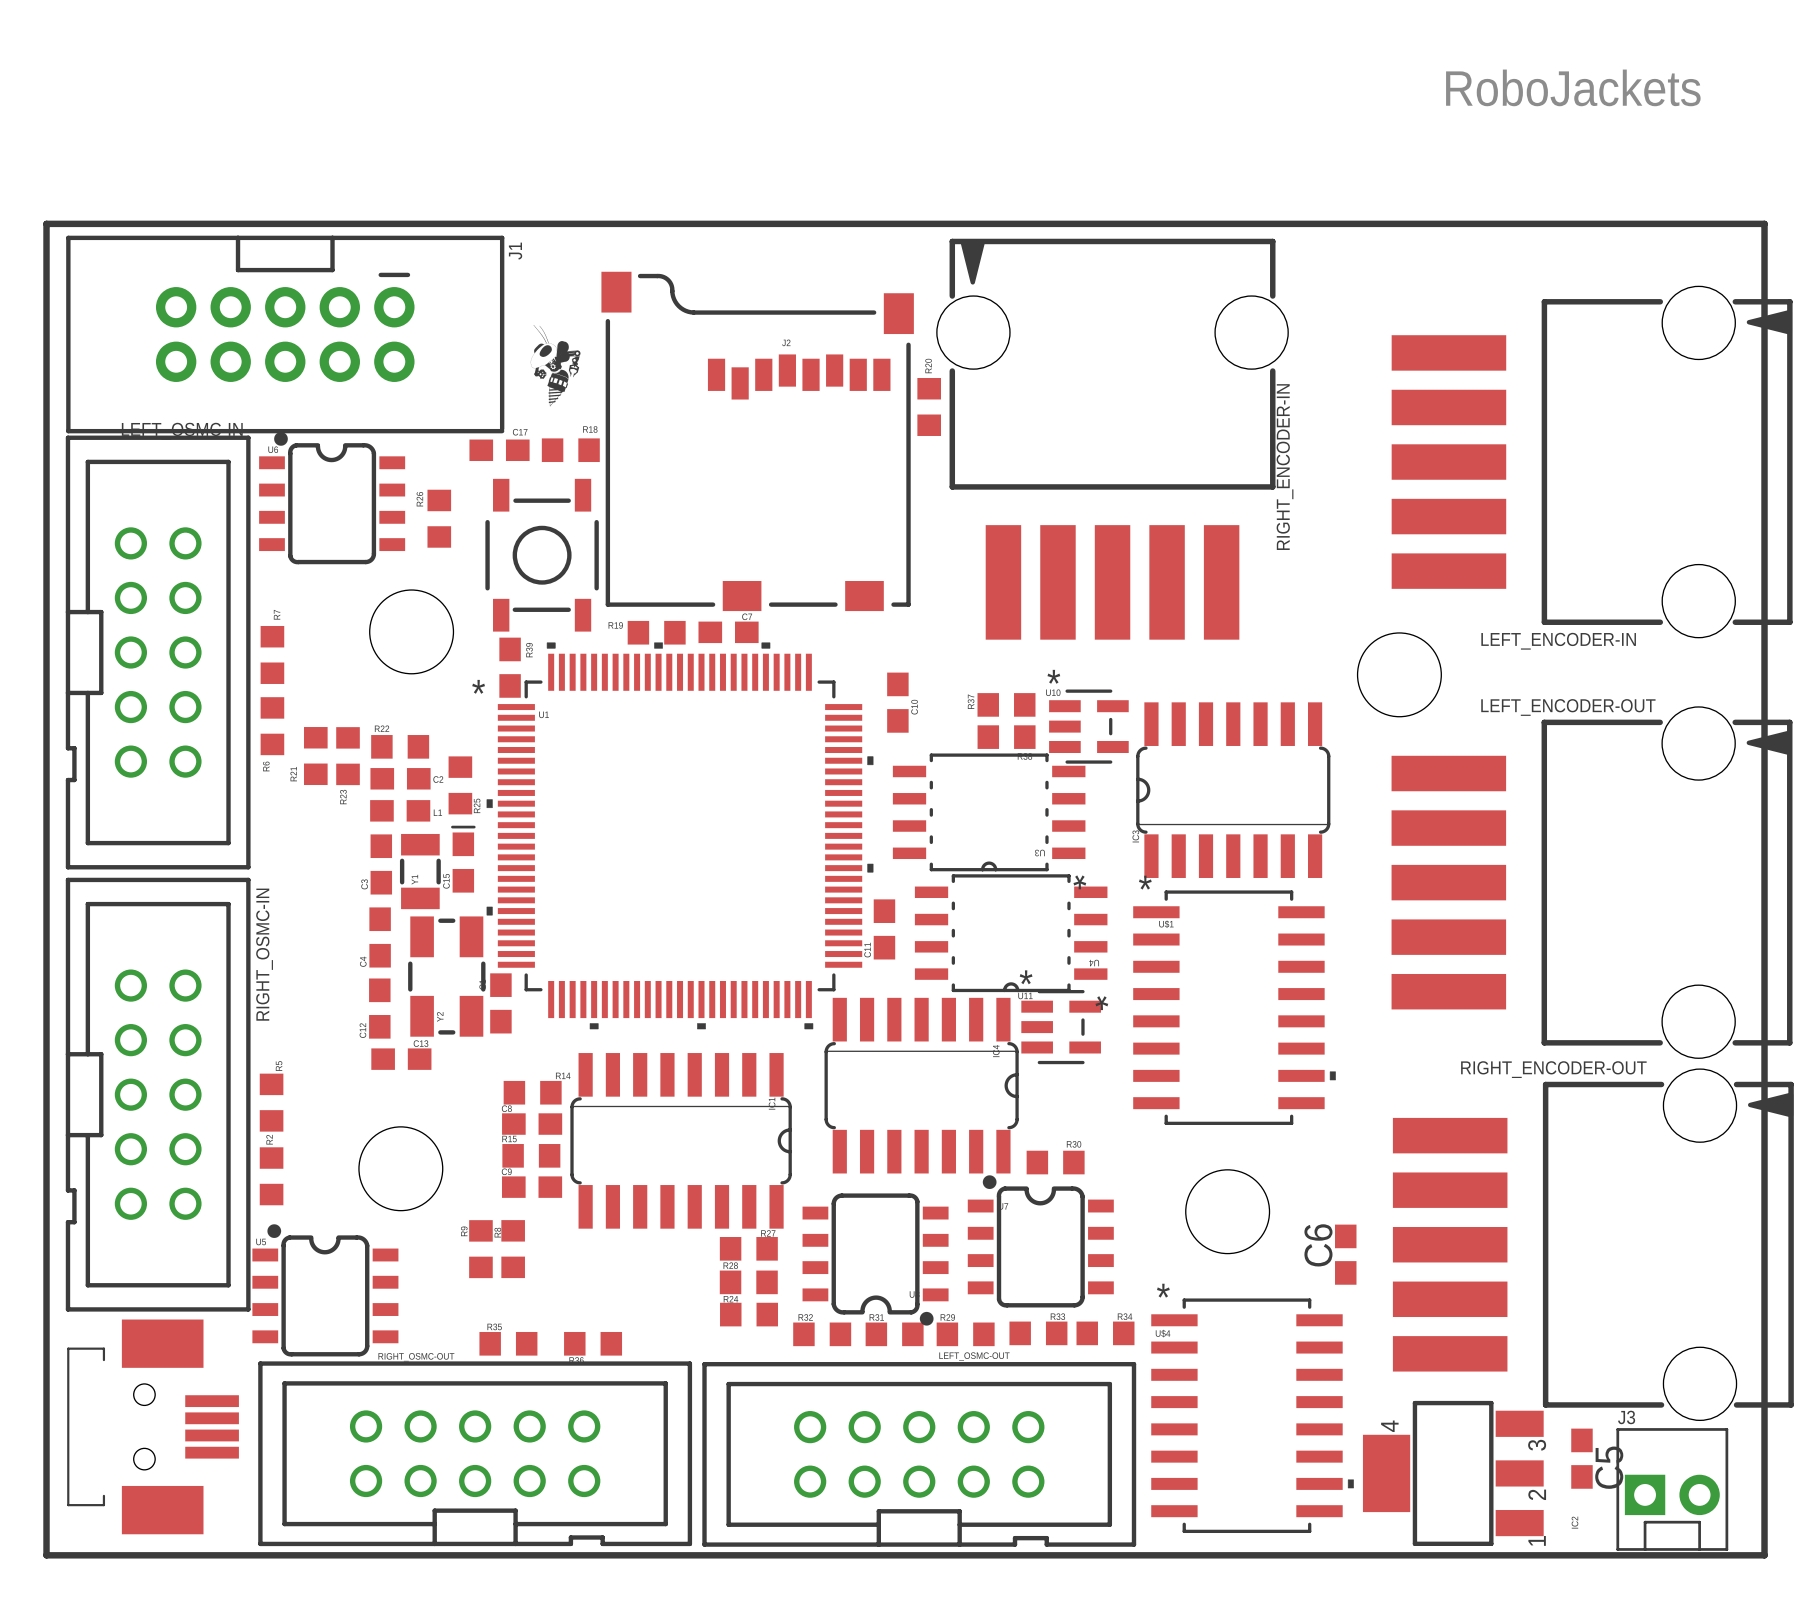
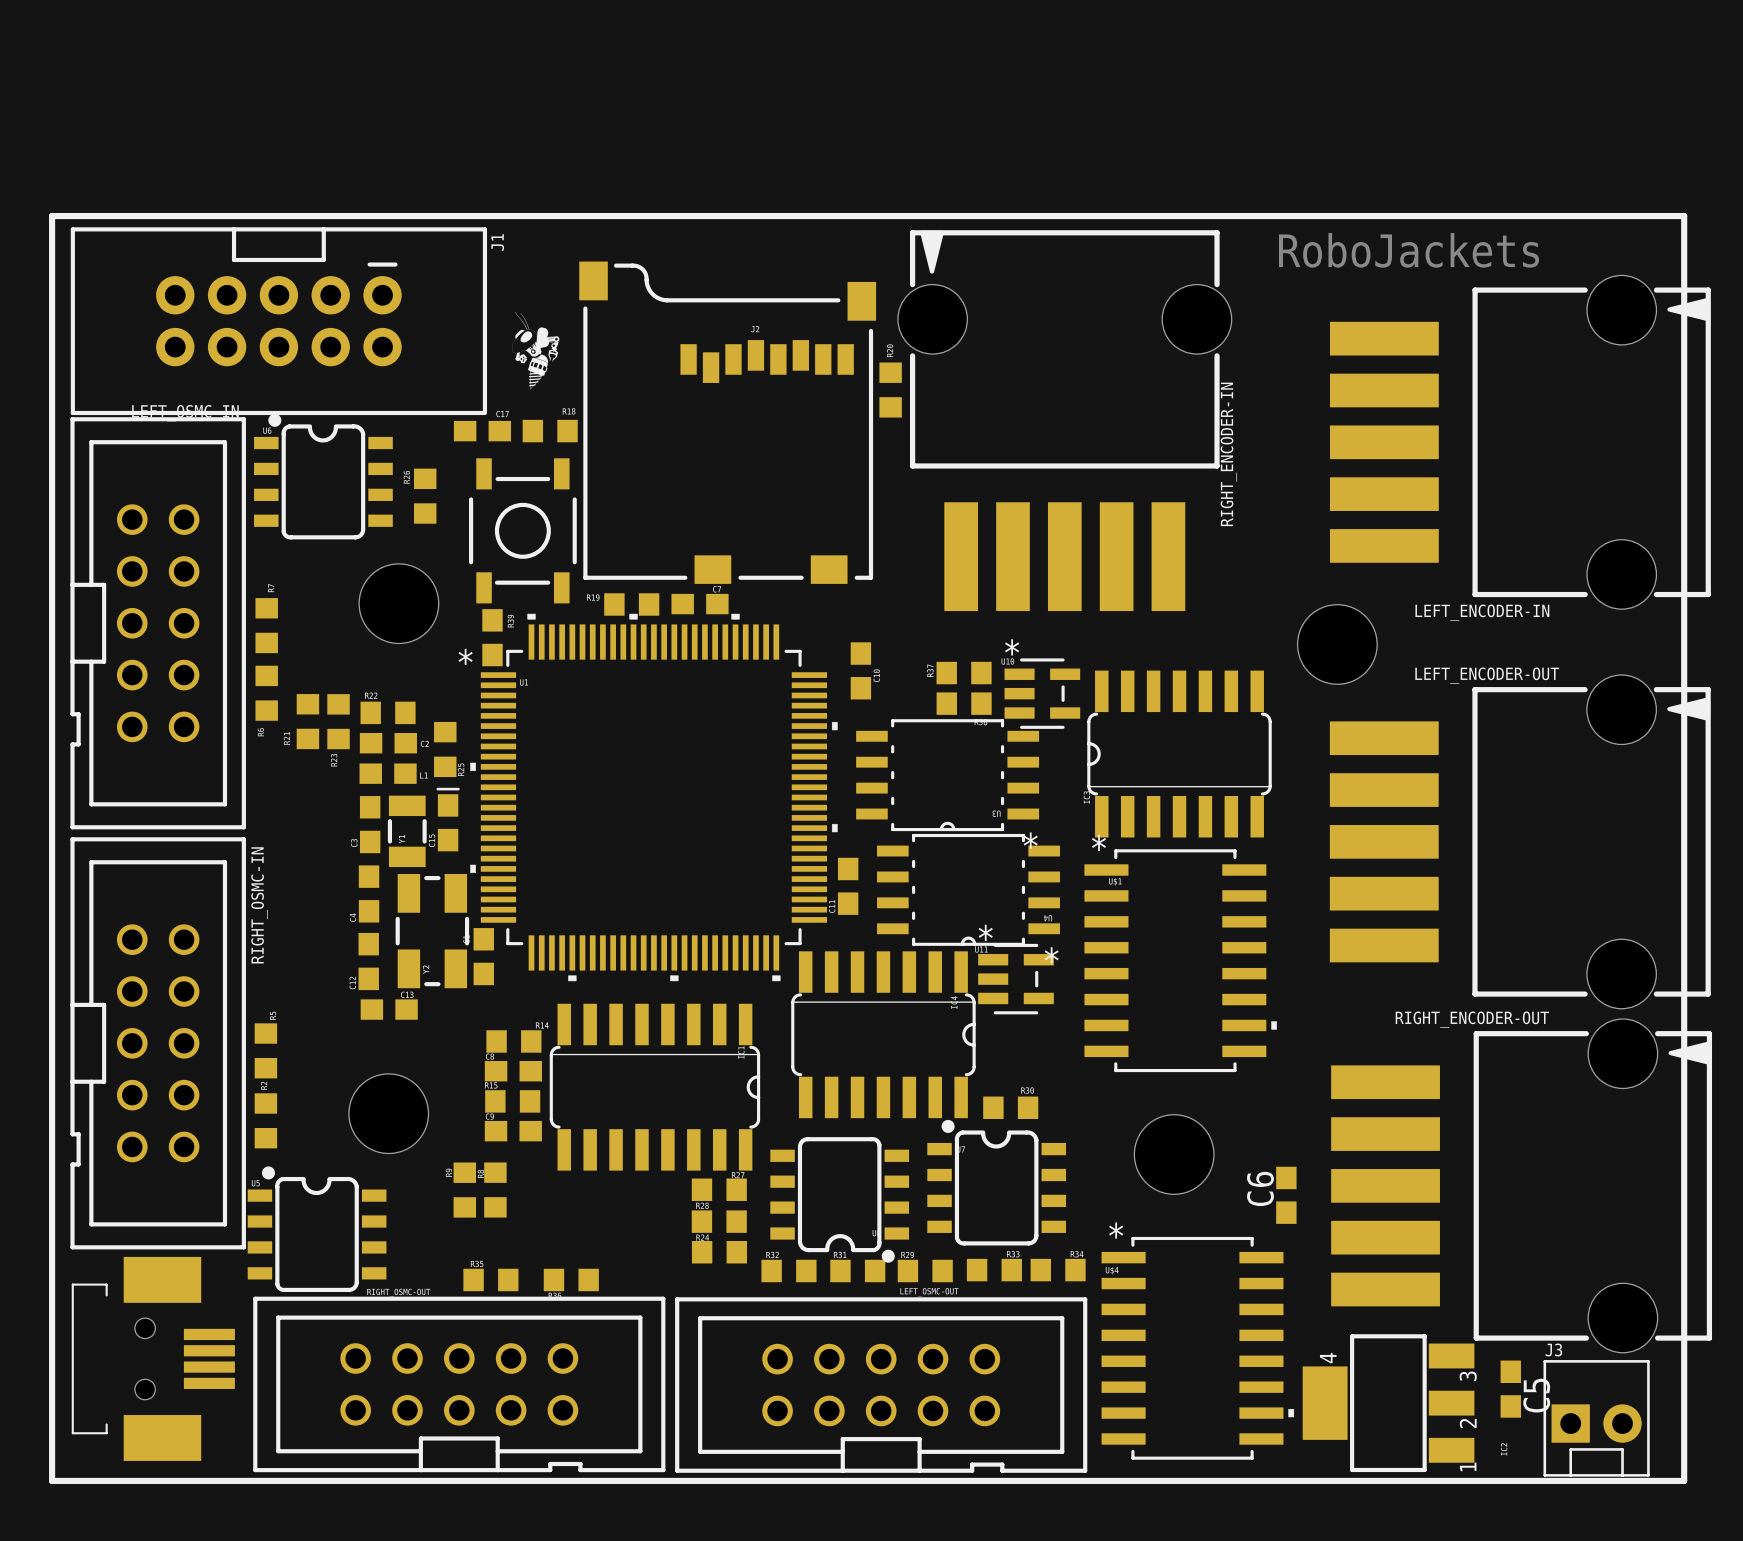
text position: RoboJackets (1573, 87) -> RoboJackets (1409, 250)

